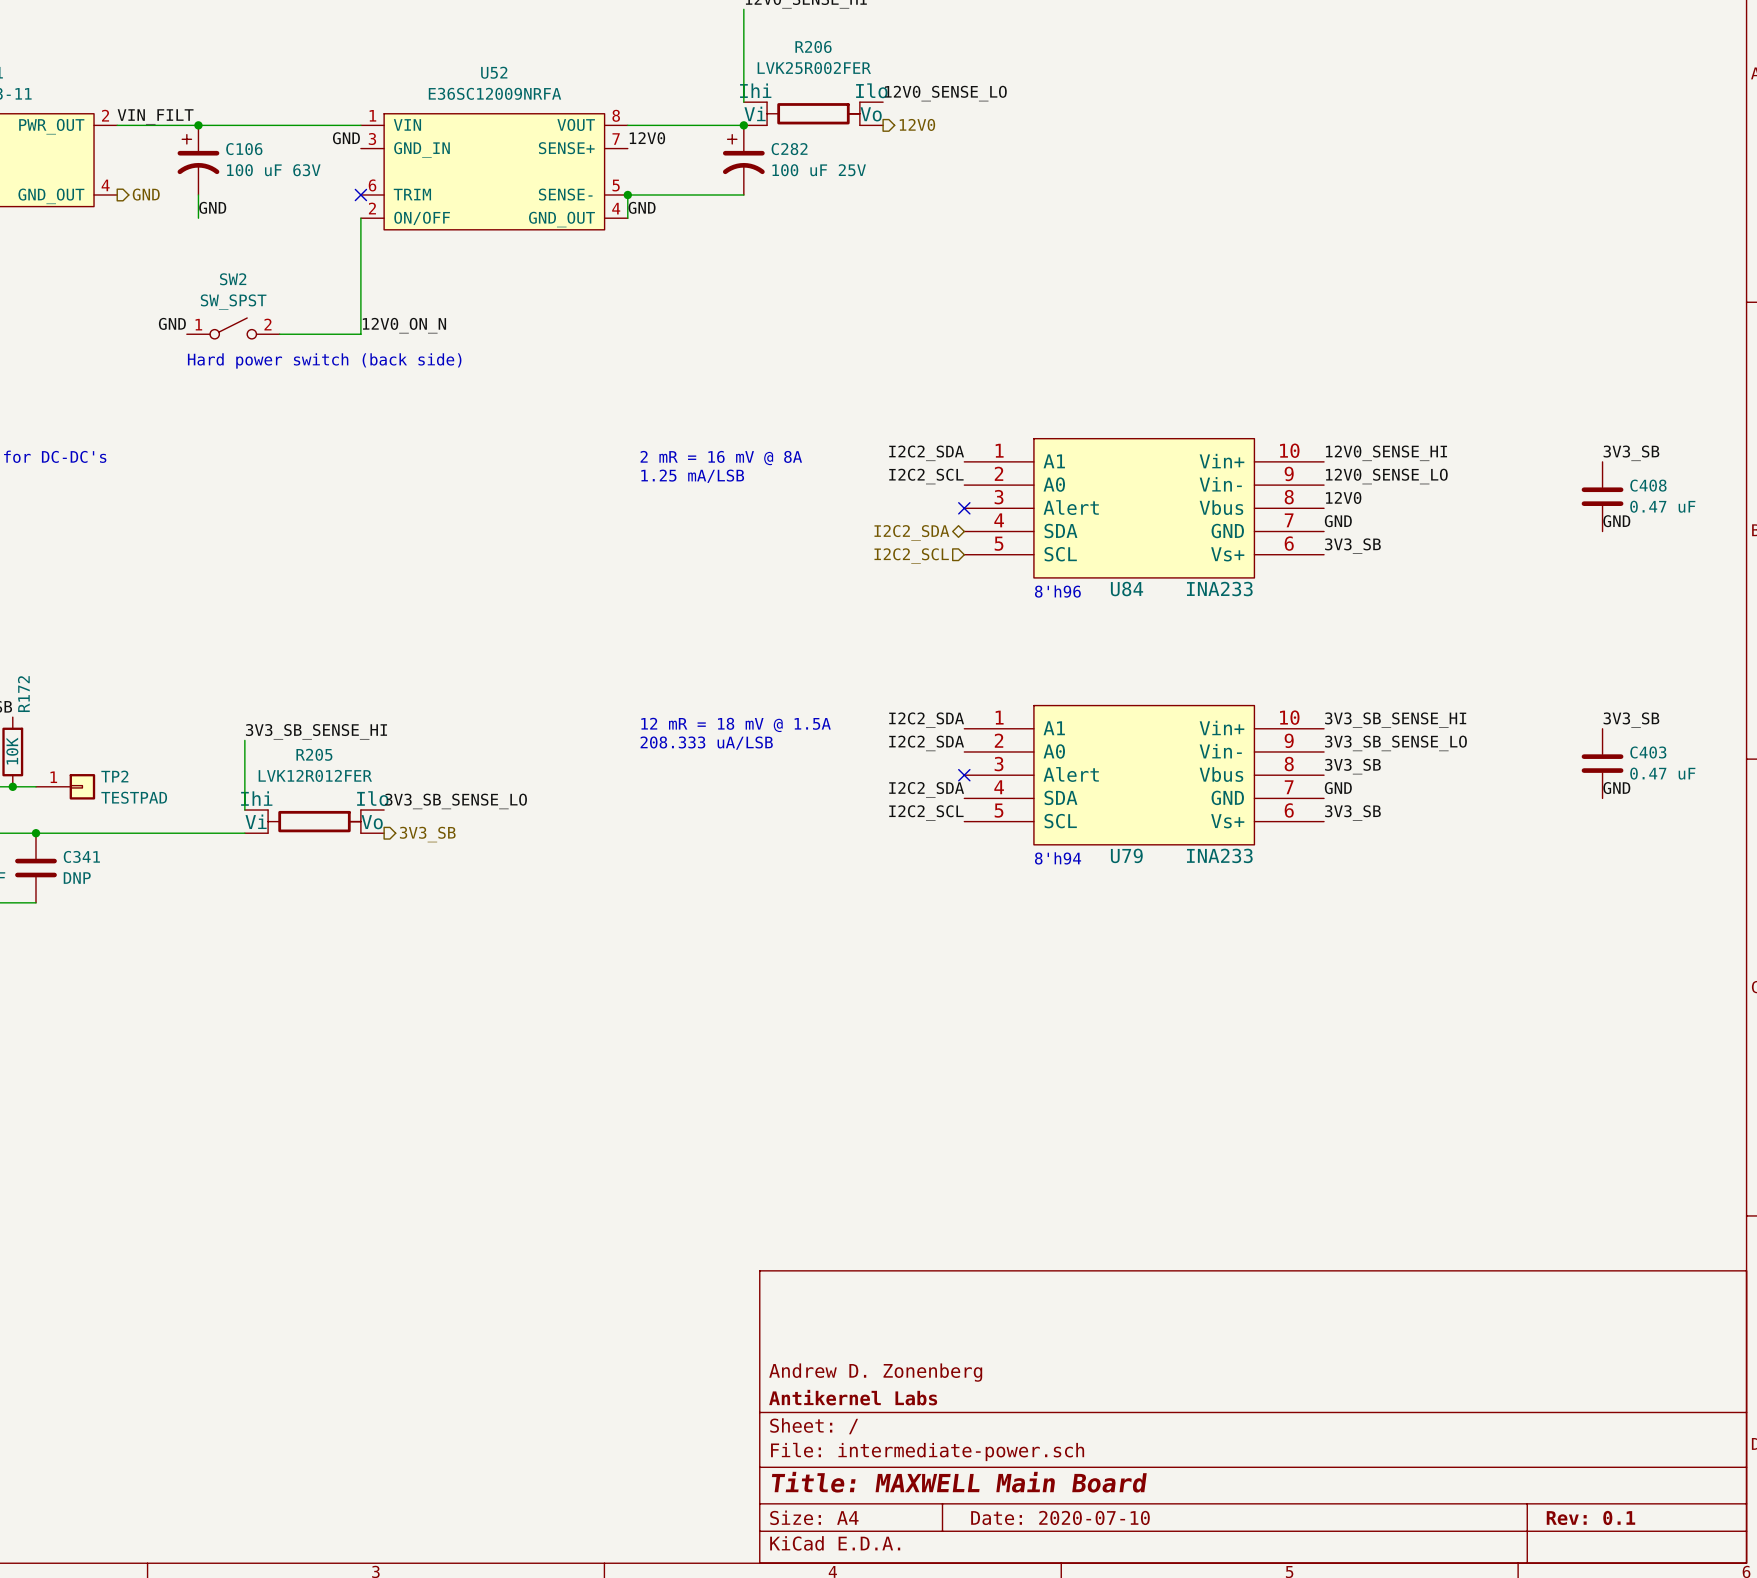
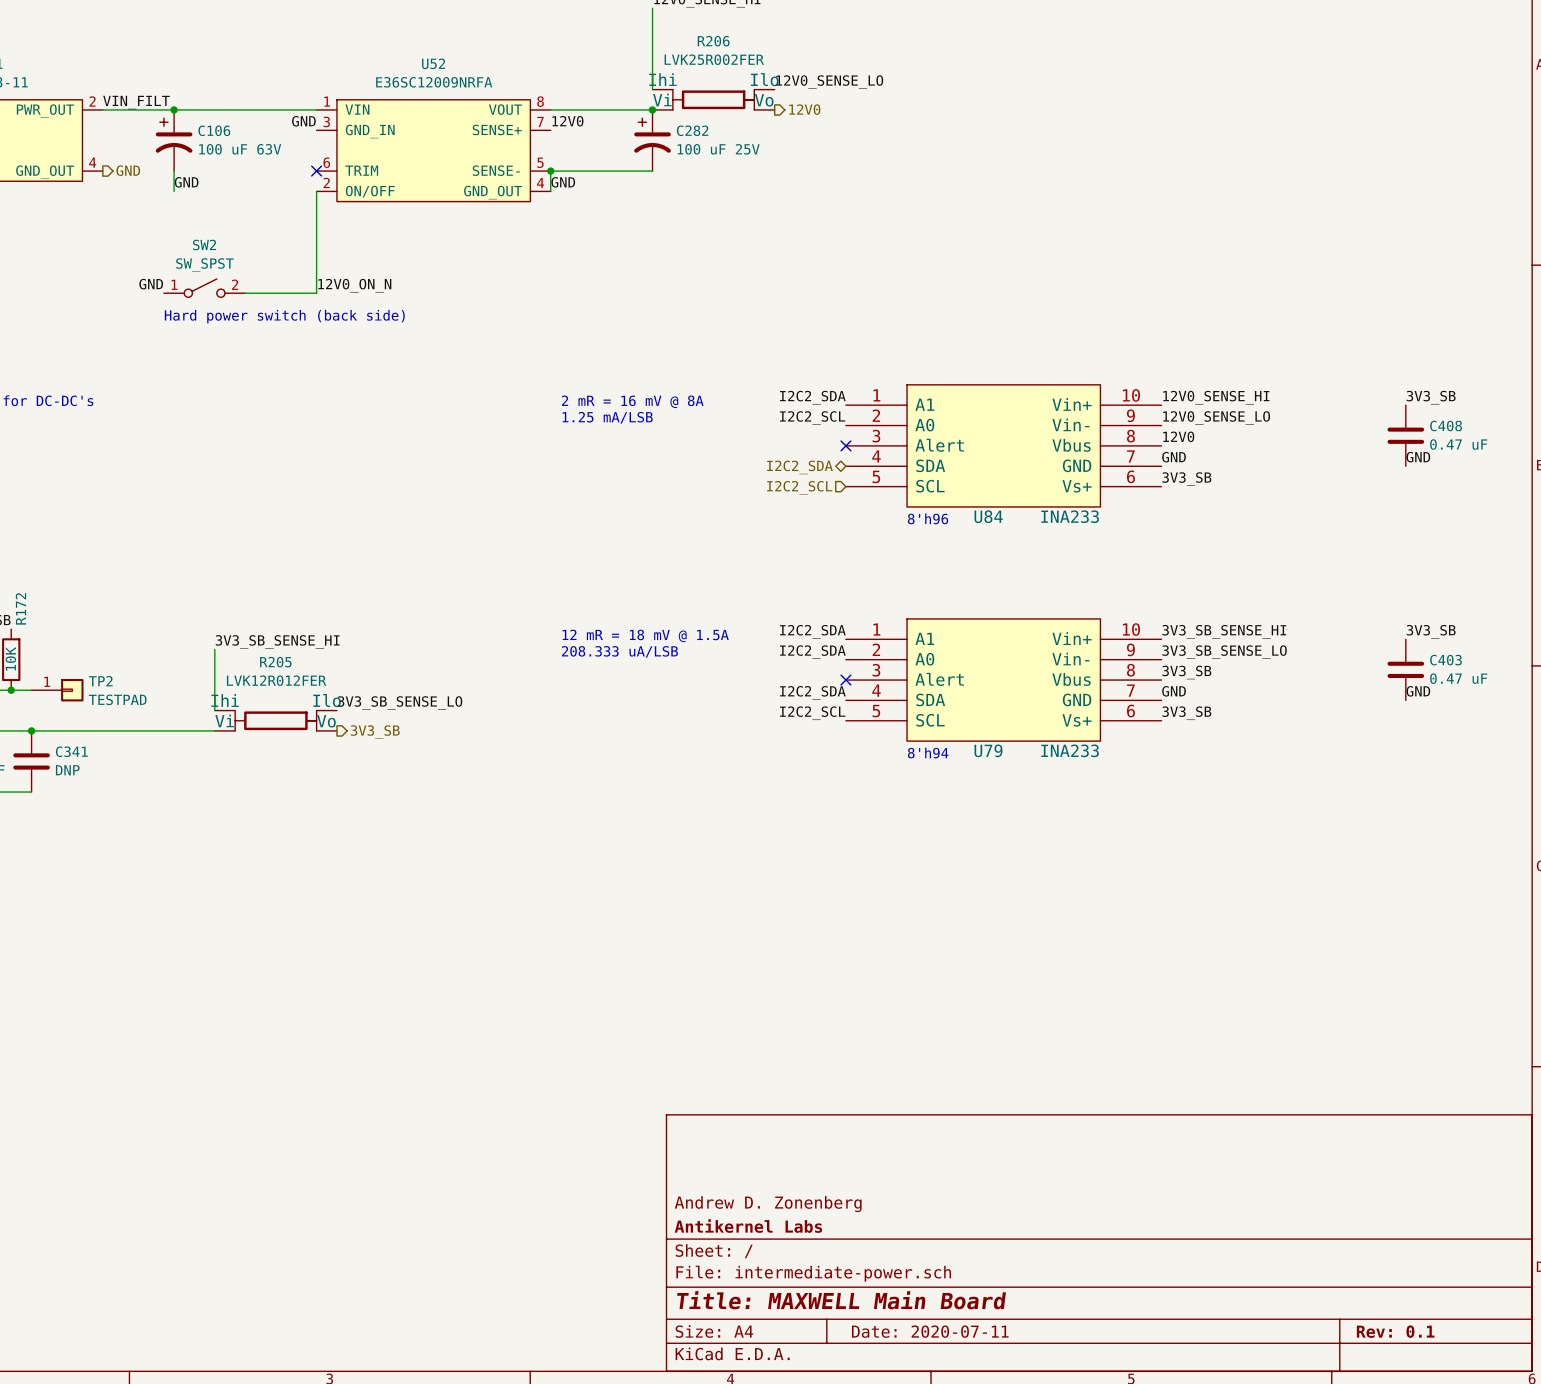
title block: Date: 2020-07-10 (1060, 1517) -> Date: 2020-07-11 (930, 1331)

